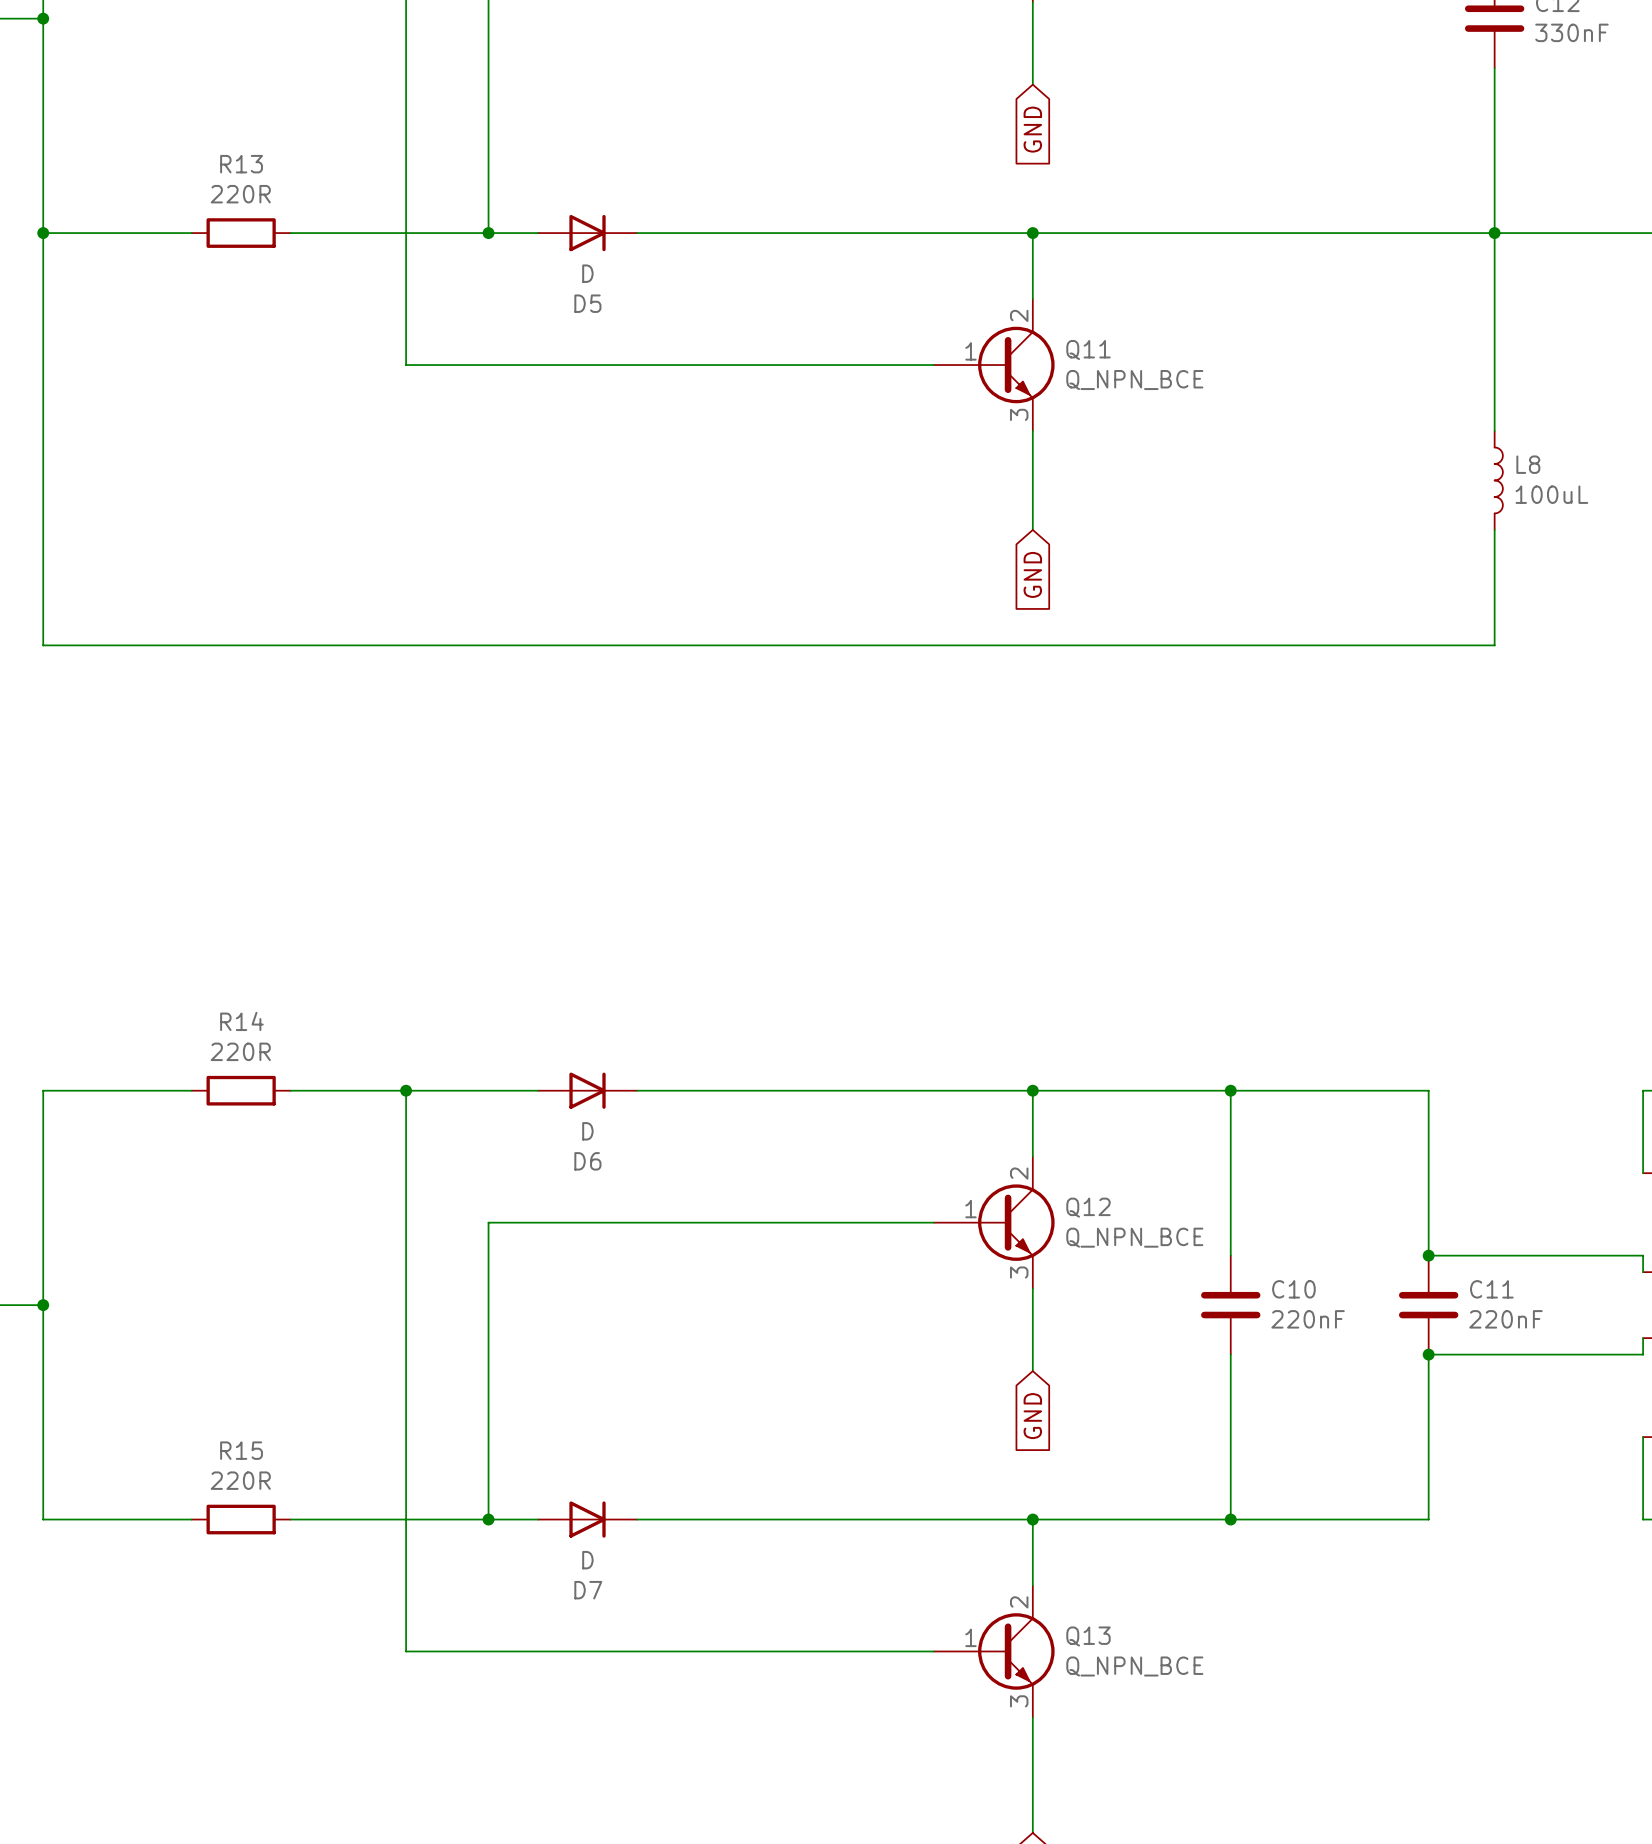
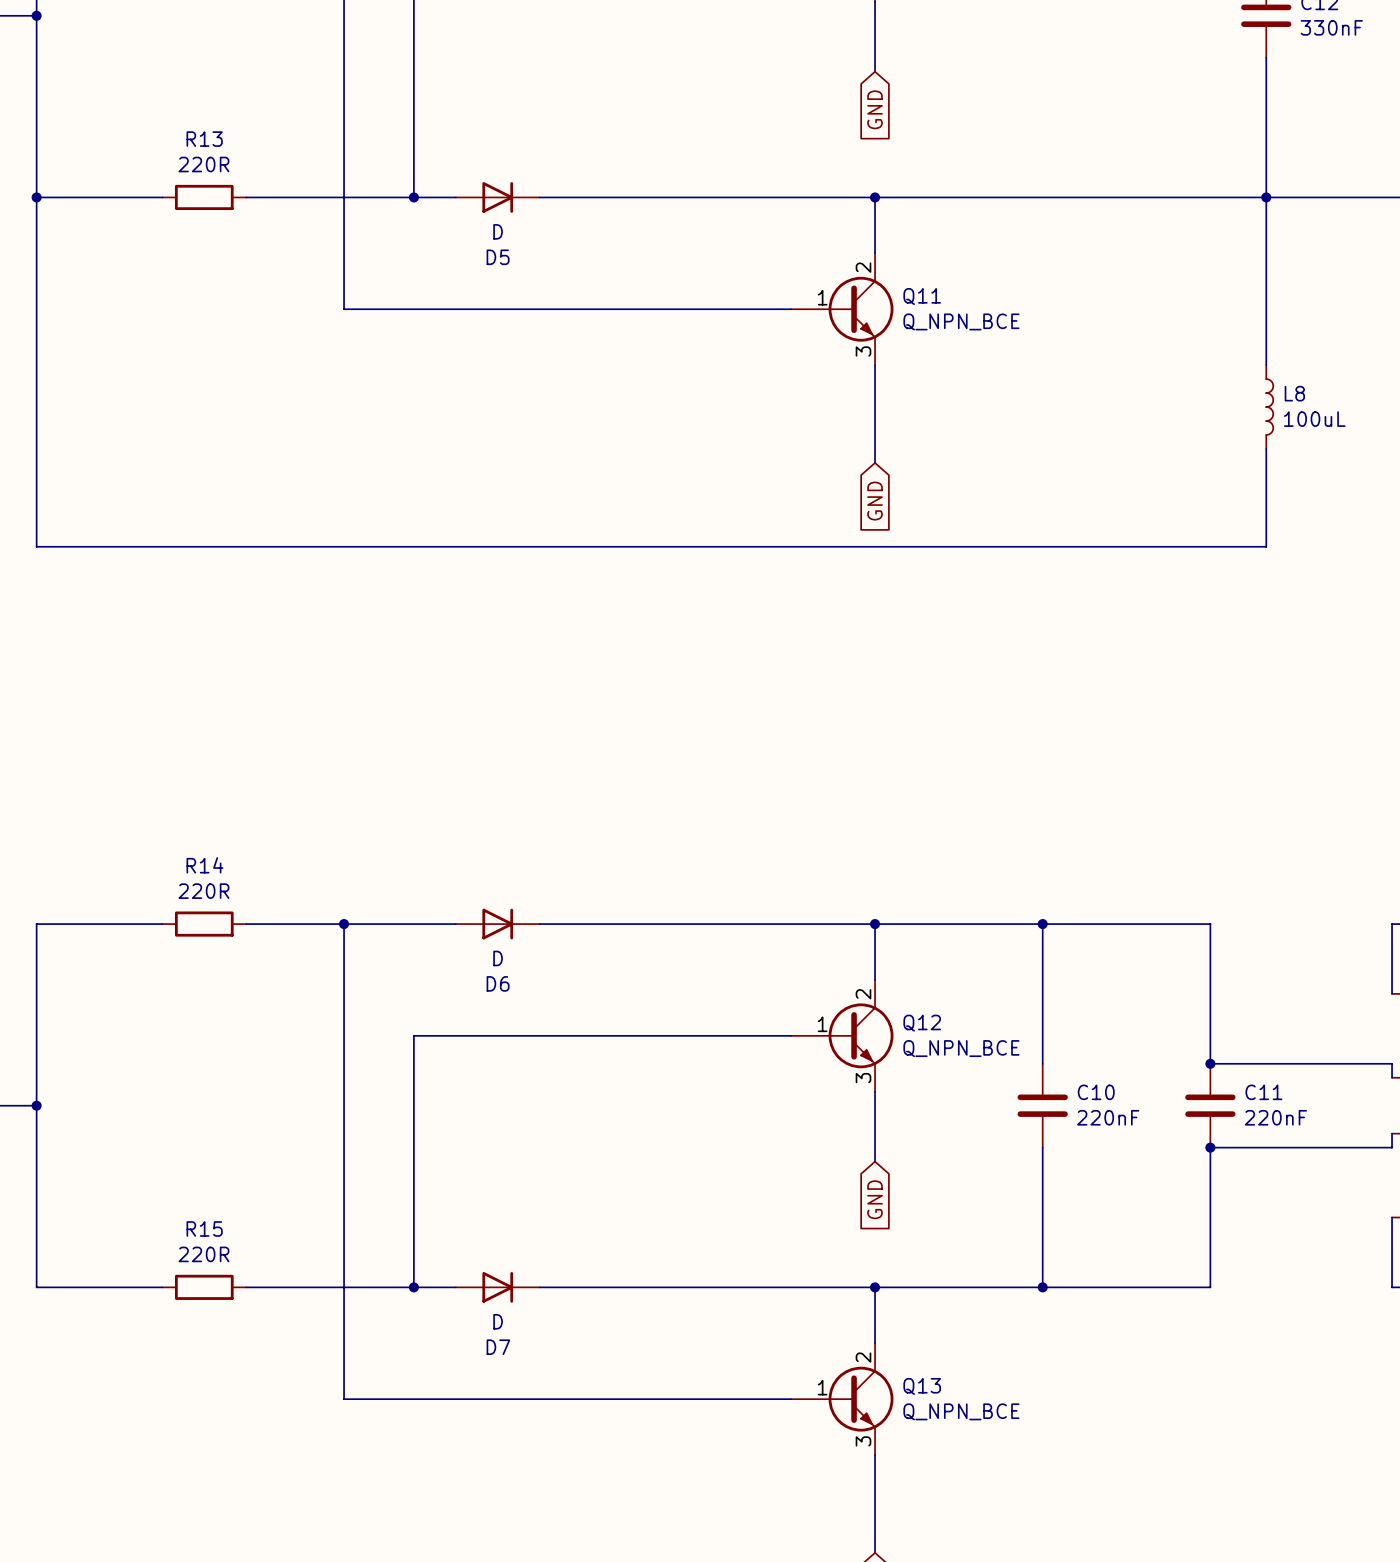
wire: none -> (875, 448) (875, 462)
global label position: GND (1032, 574) -> GND (875, 501)

